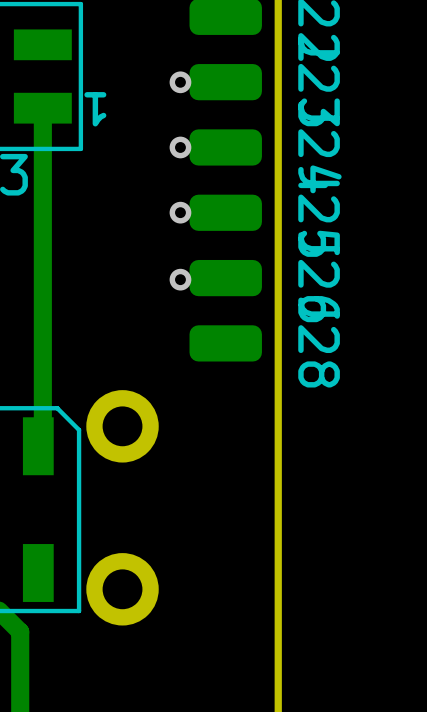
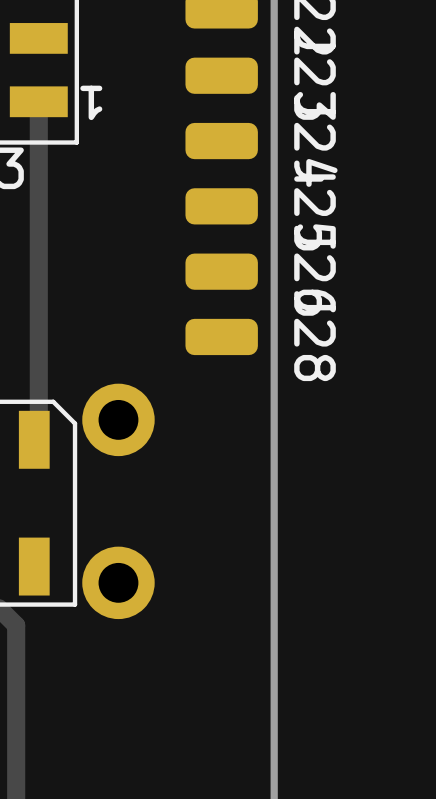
via: (180, 82) -> none
via: (180, 147) -> none
via: (180, 212) -> none
via: (180, 279) -> none

